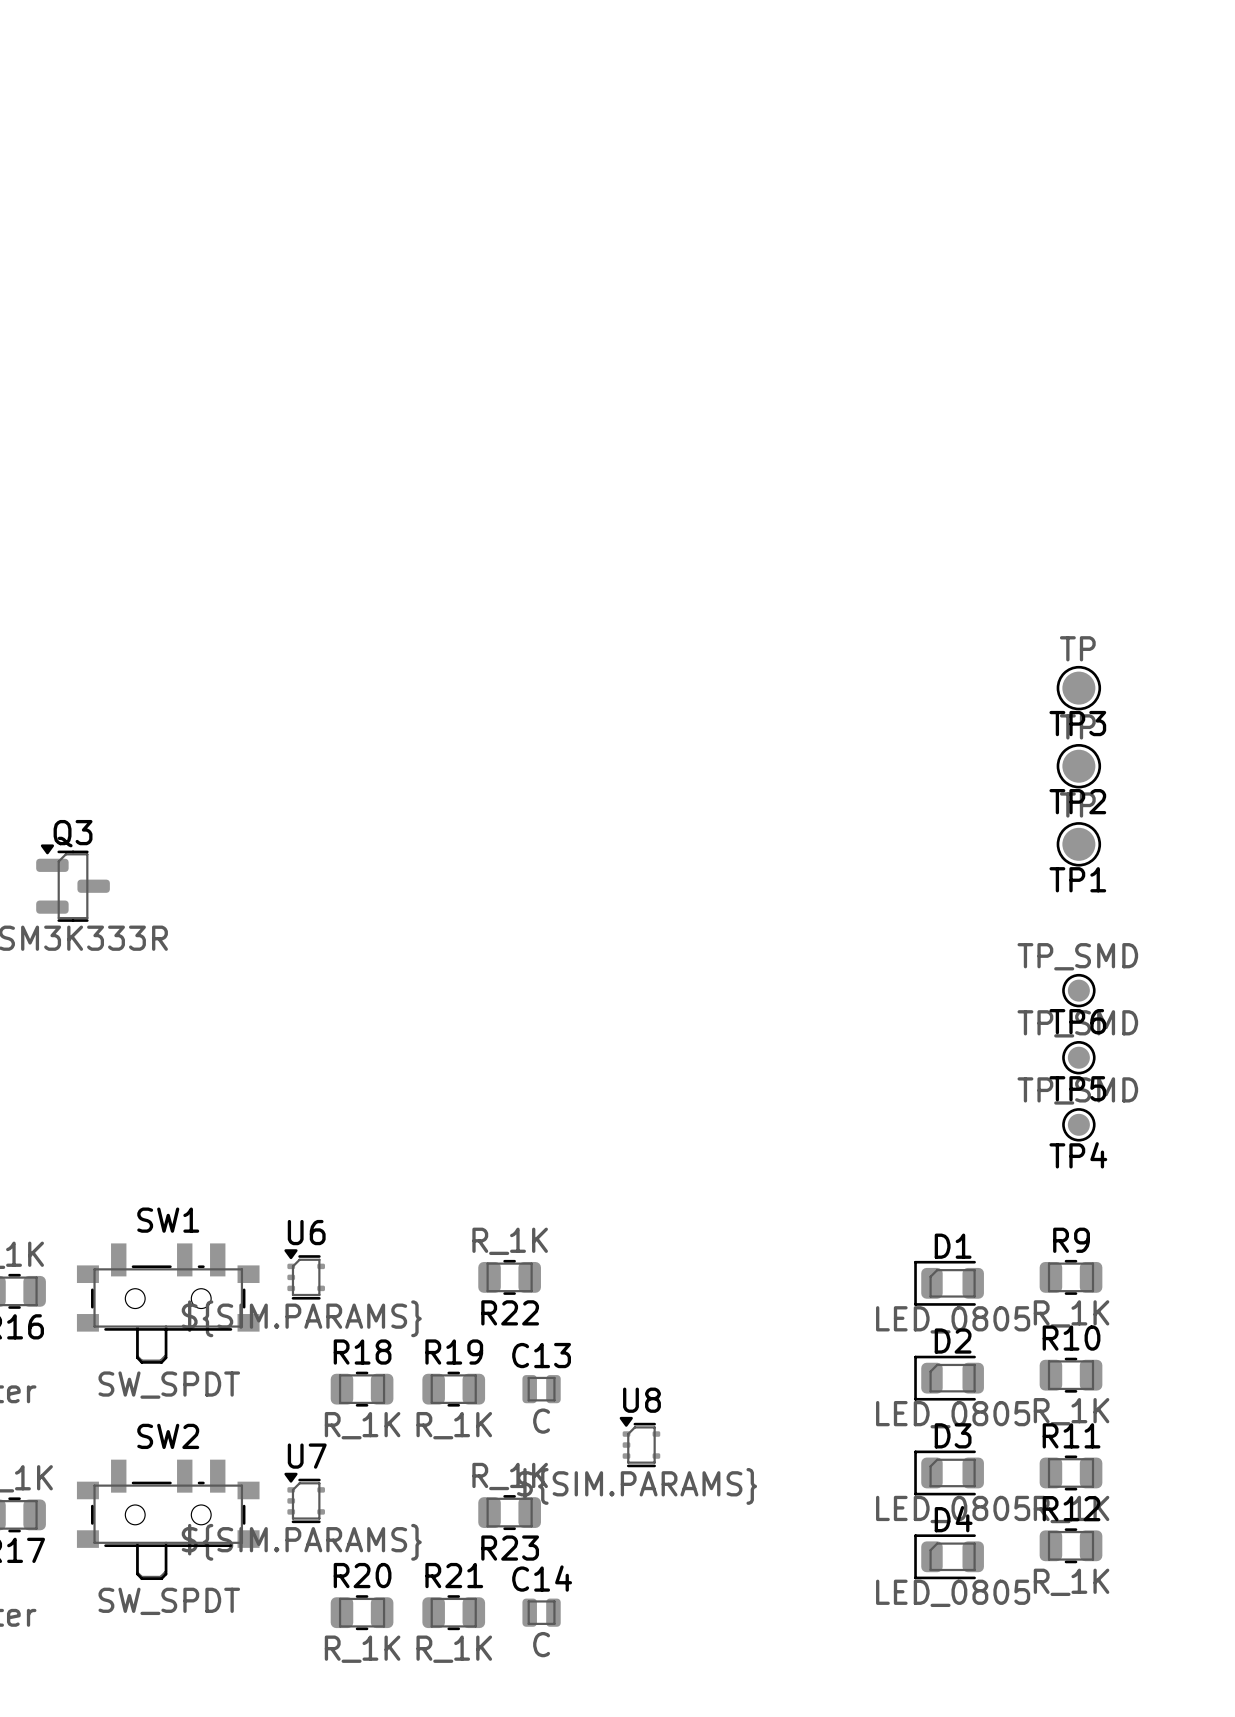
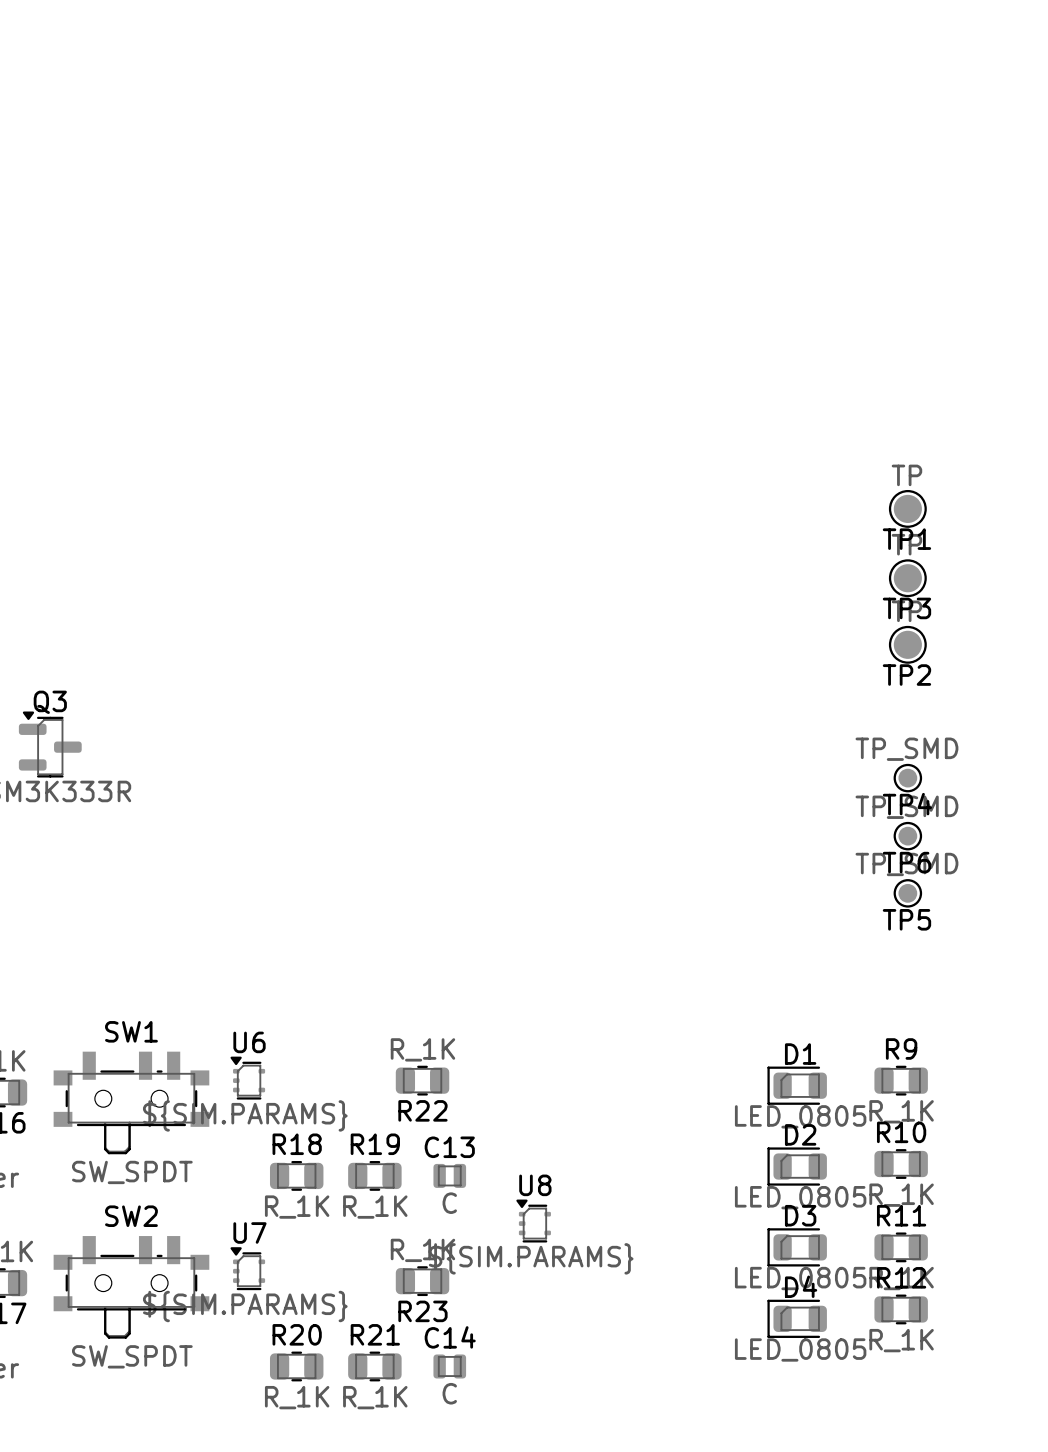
TP1 position: (1078, 844) -> (907, 508)
TP4 position: (1078, 1124) -> (907, 778)

